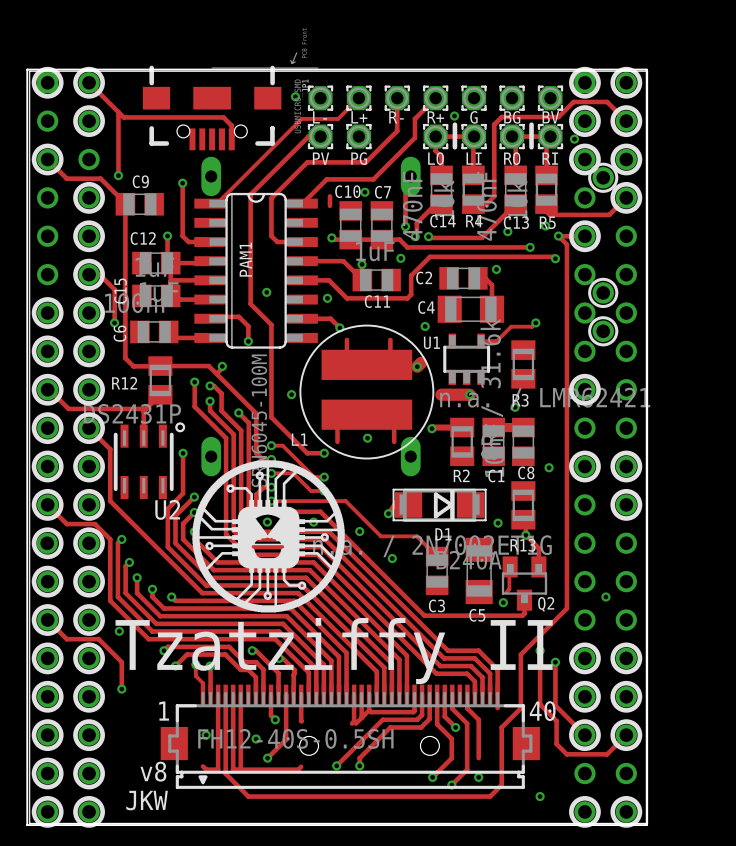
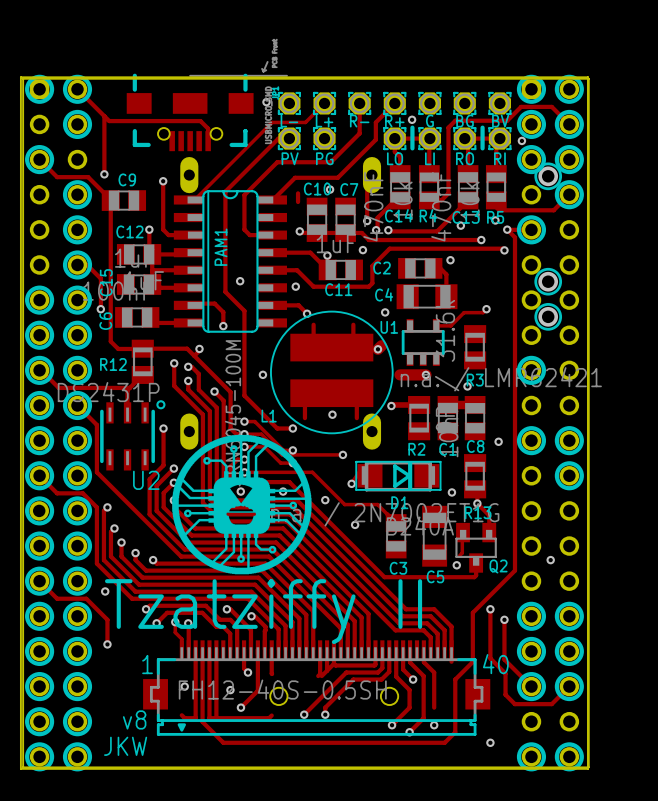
track: none -> (244, 434) (261, 434) (282, 454) (342, 454)
via: none -> (342, 454)

